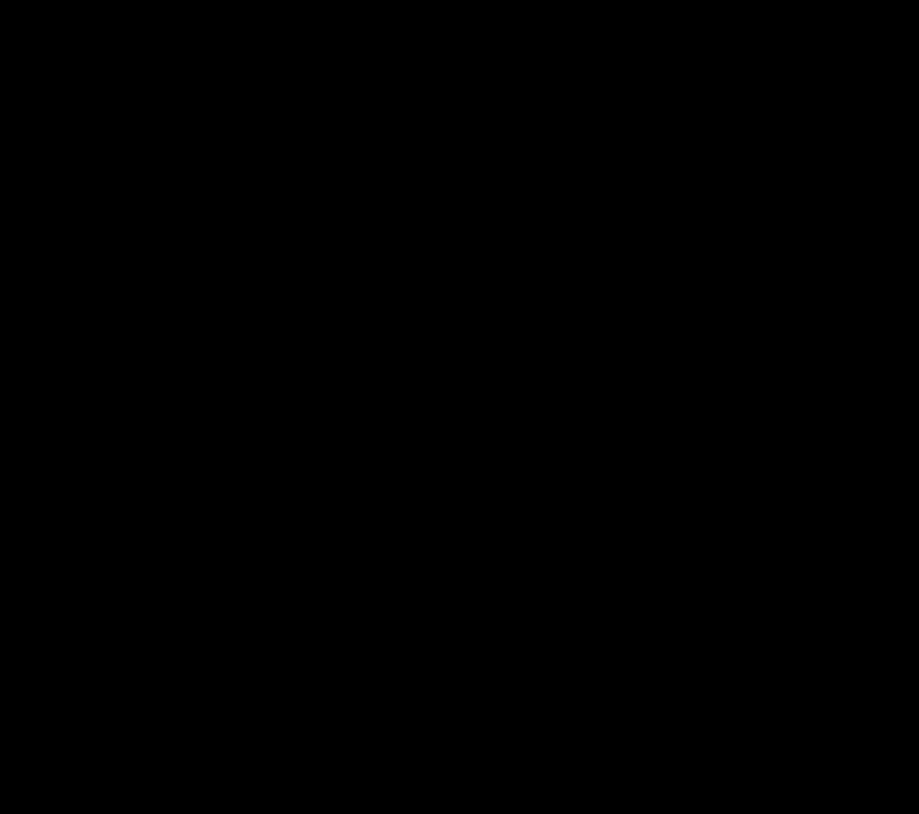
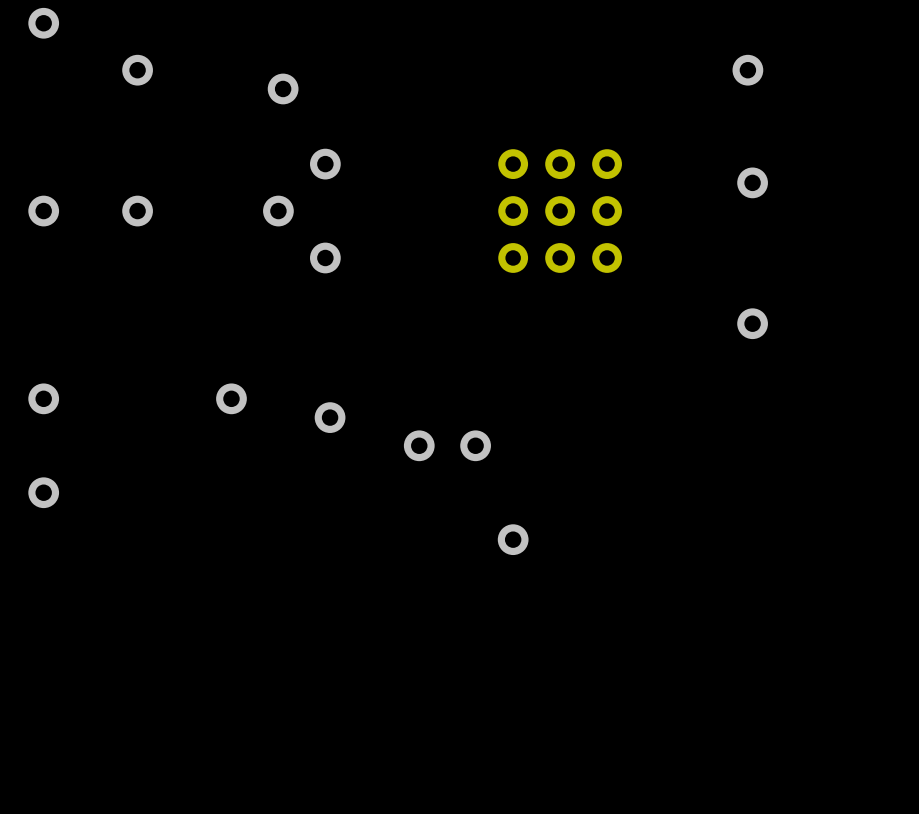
via: none -> (43, 23)
via: none -> (137, 70)
via: none -> (747, 70)
via: none -> (283, 88)
via: none -> (325, 164)
via: none -> (752, 182)
via: none -> (43, 211)
via: none -> (137, 211)
via: none -> (278, 211)
part: none -> (560, 211)
via: none -> (325, 257)
via: none -> (752, 323)
via: none -> (43, 398)
via: none -> (231, 398)
via: none -> (330, 417)
via: none -> (419, 445)
via: none -> (475, 445)
via: none -> (43, 492)
via: none -> (513, 539)

